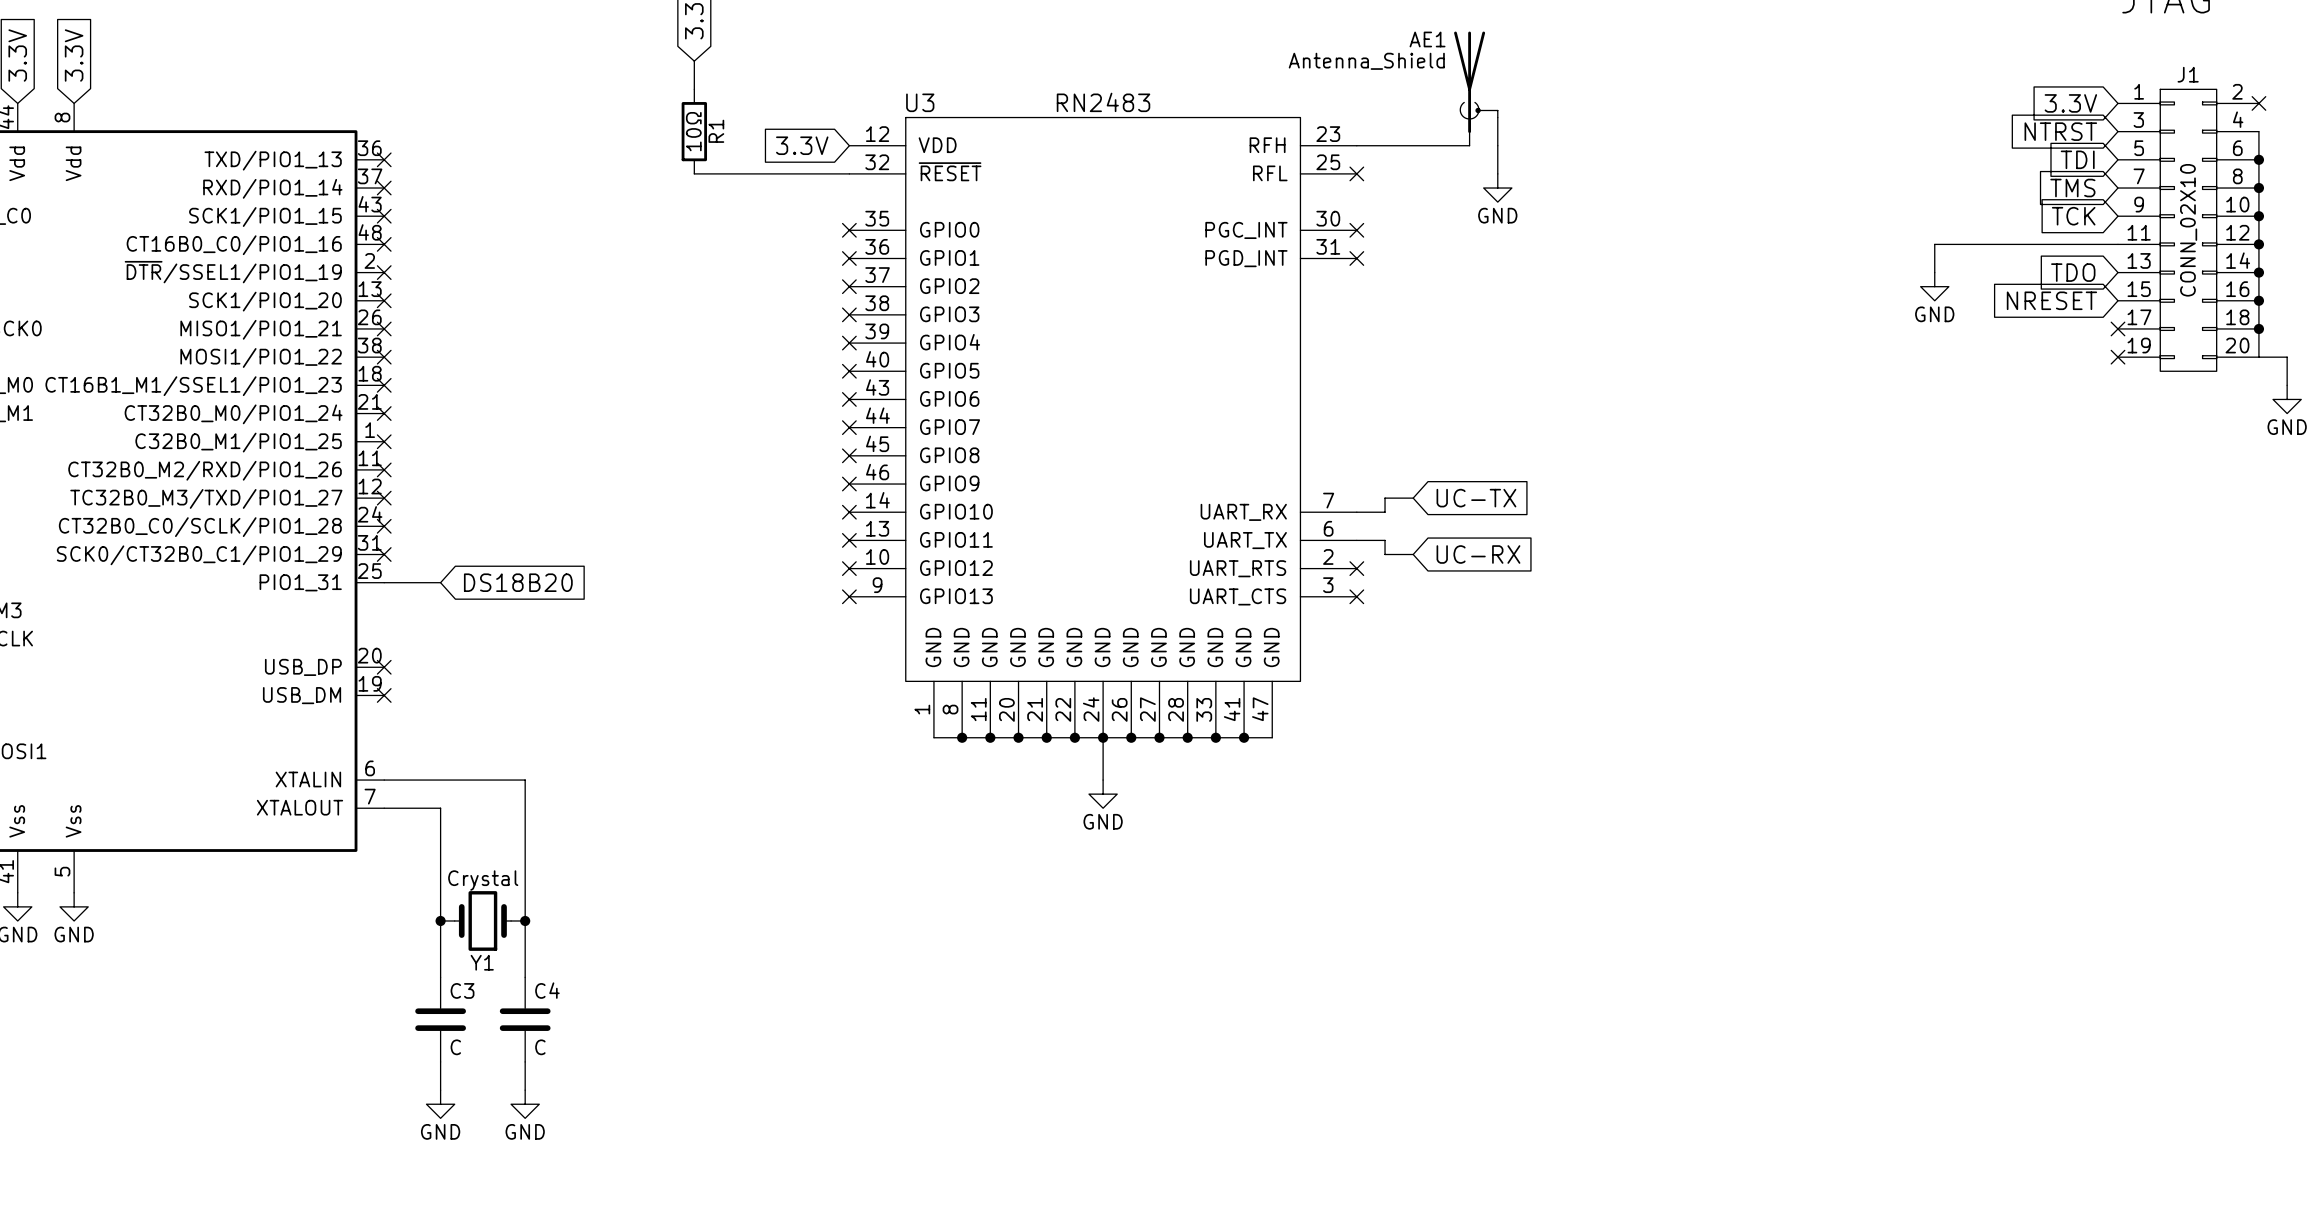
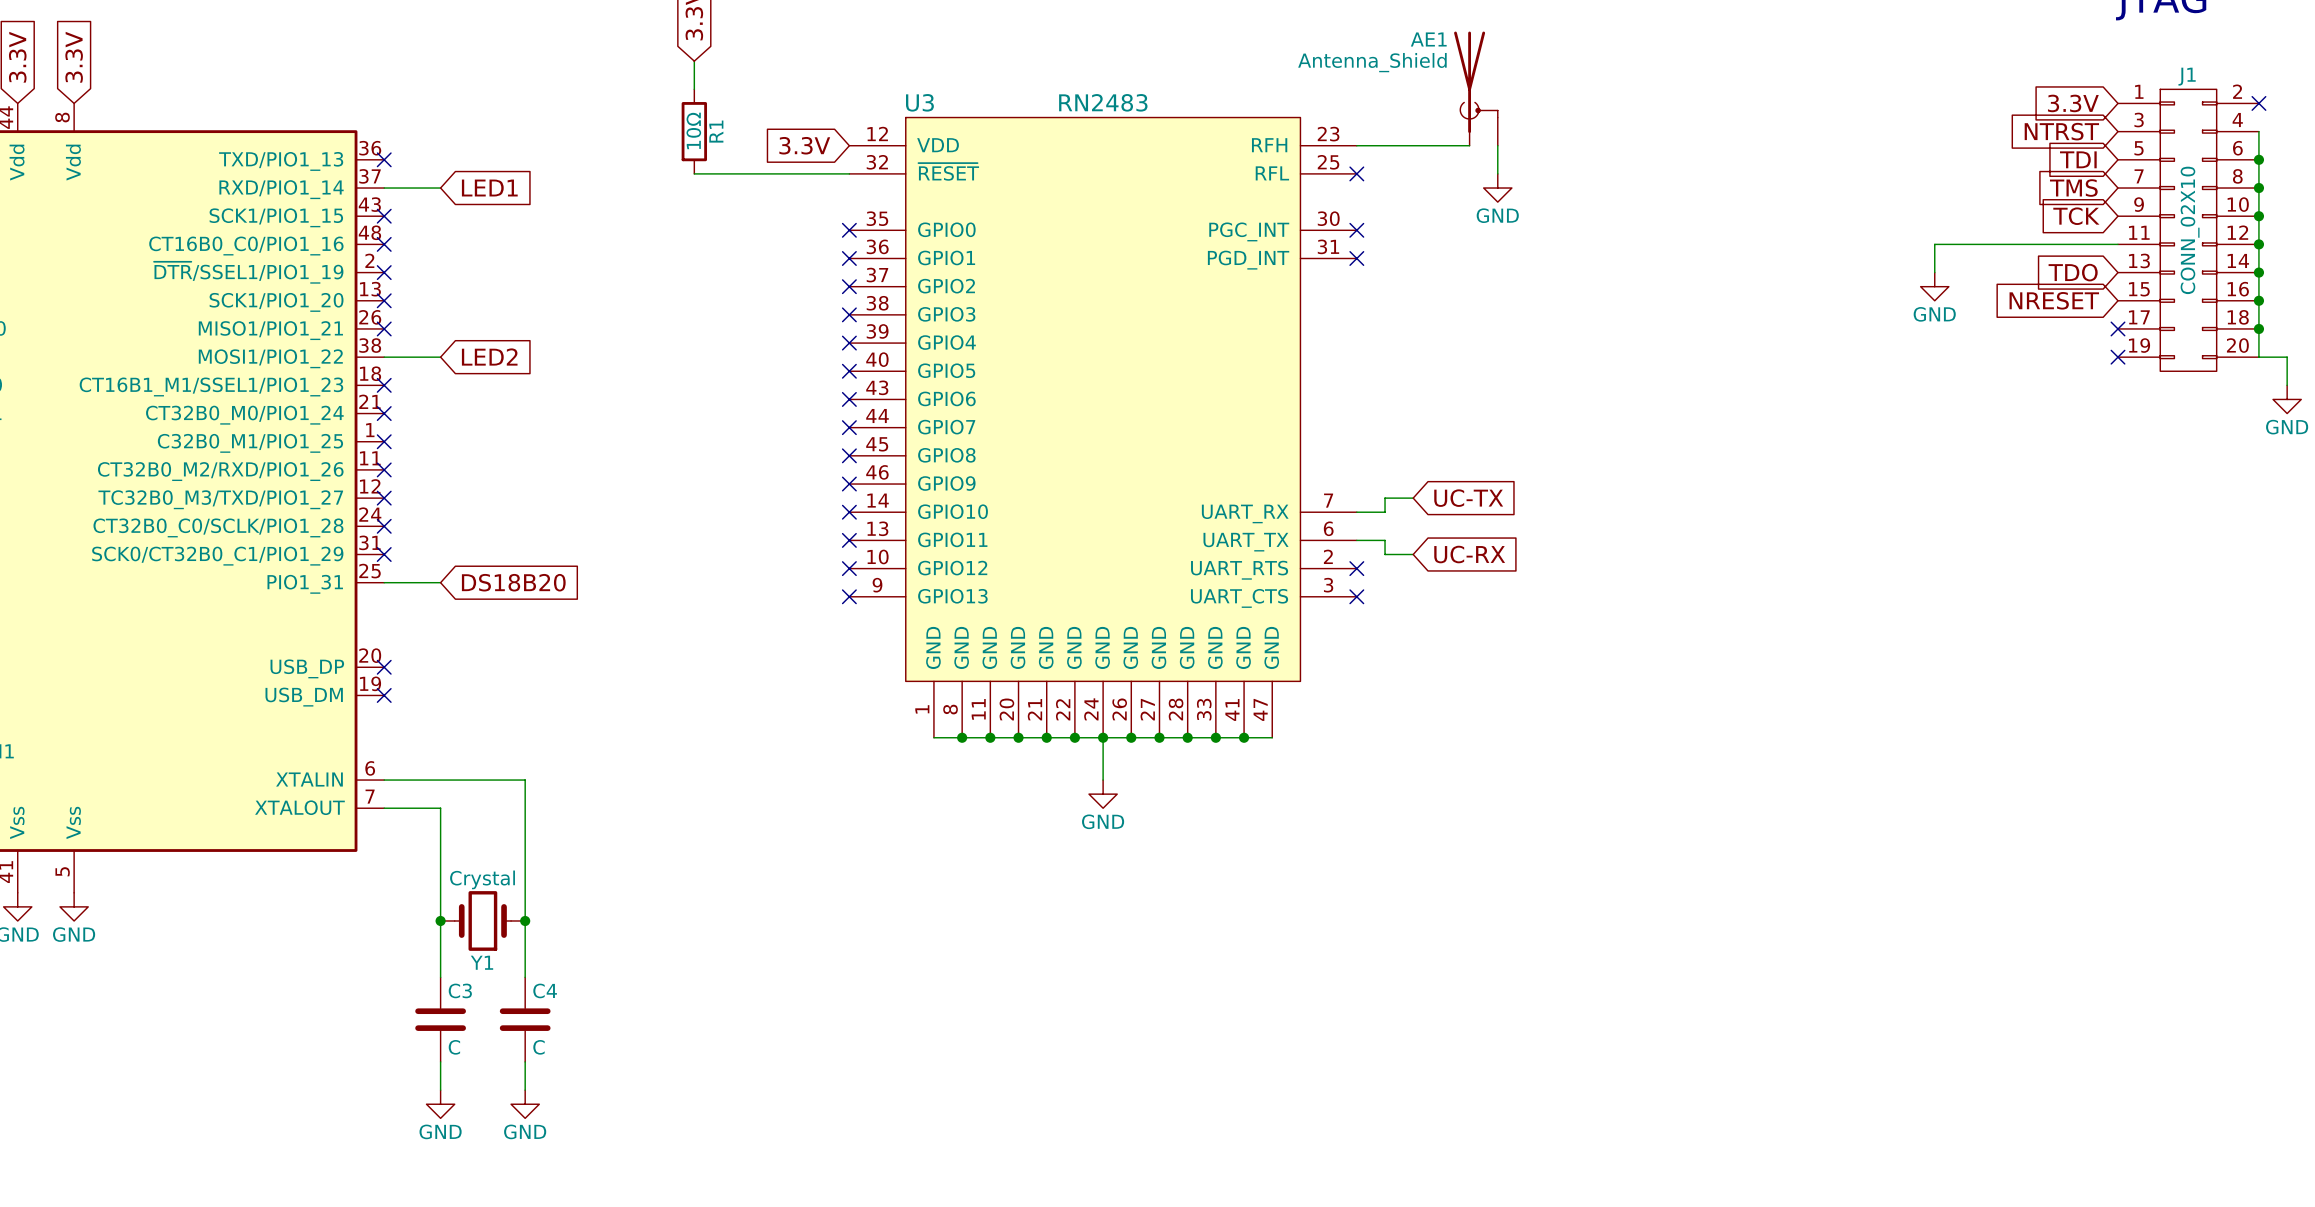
wire: none -> (384, 188) (440, 188)
no-connect mark: (384, 188) -> none
global label: none -> LED1 (489, 188)
wire: none -> (384, 357) (440, 357)
no-connect mark: (384, 357) -> none
global label: none -> LED2 (489, 357)

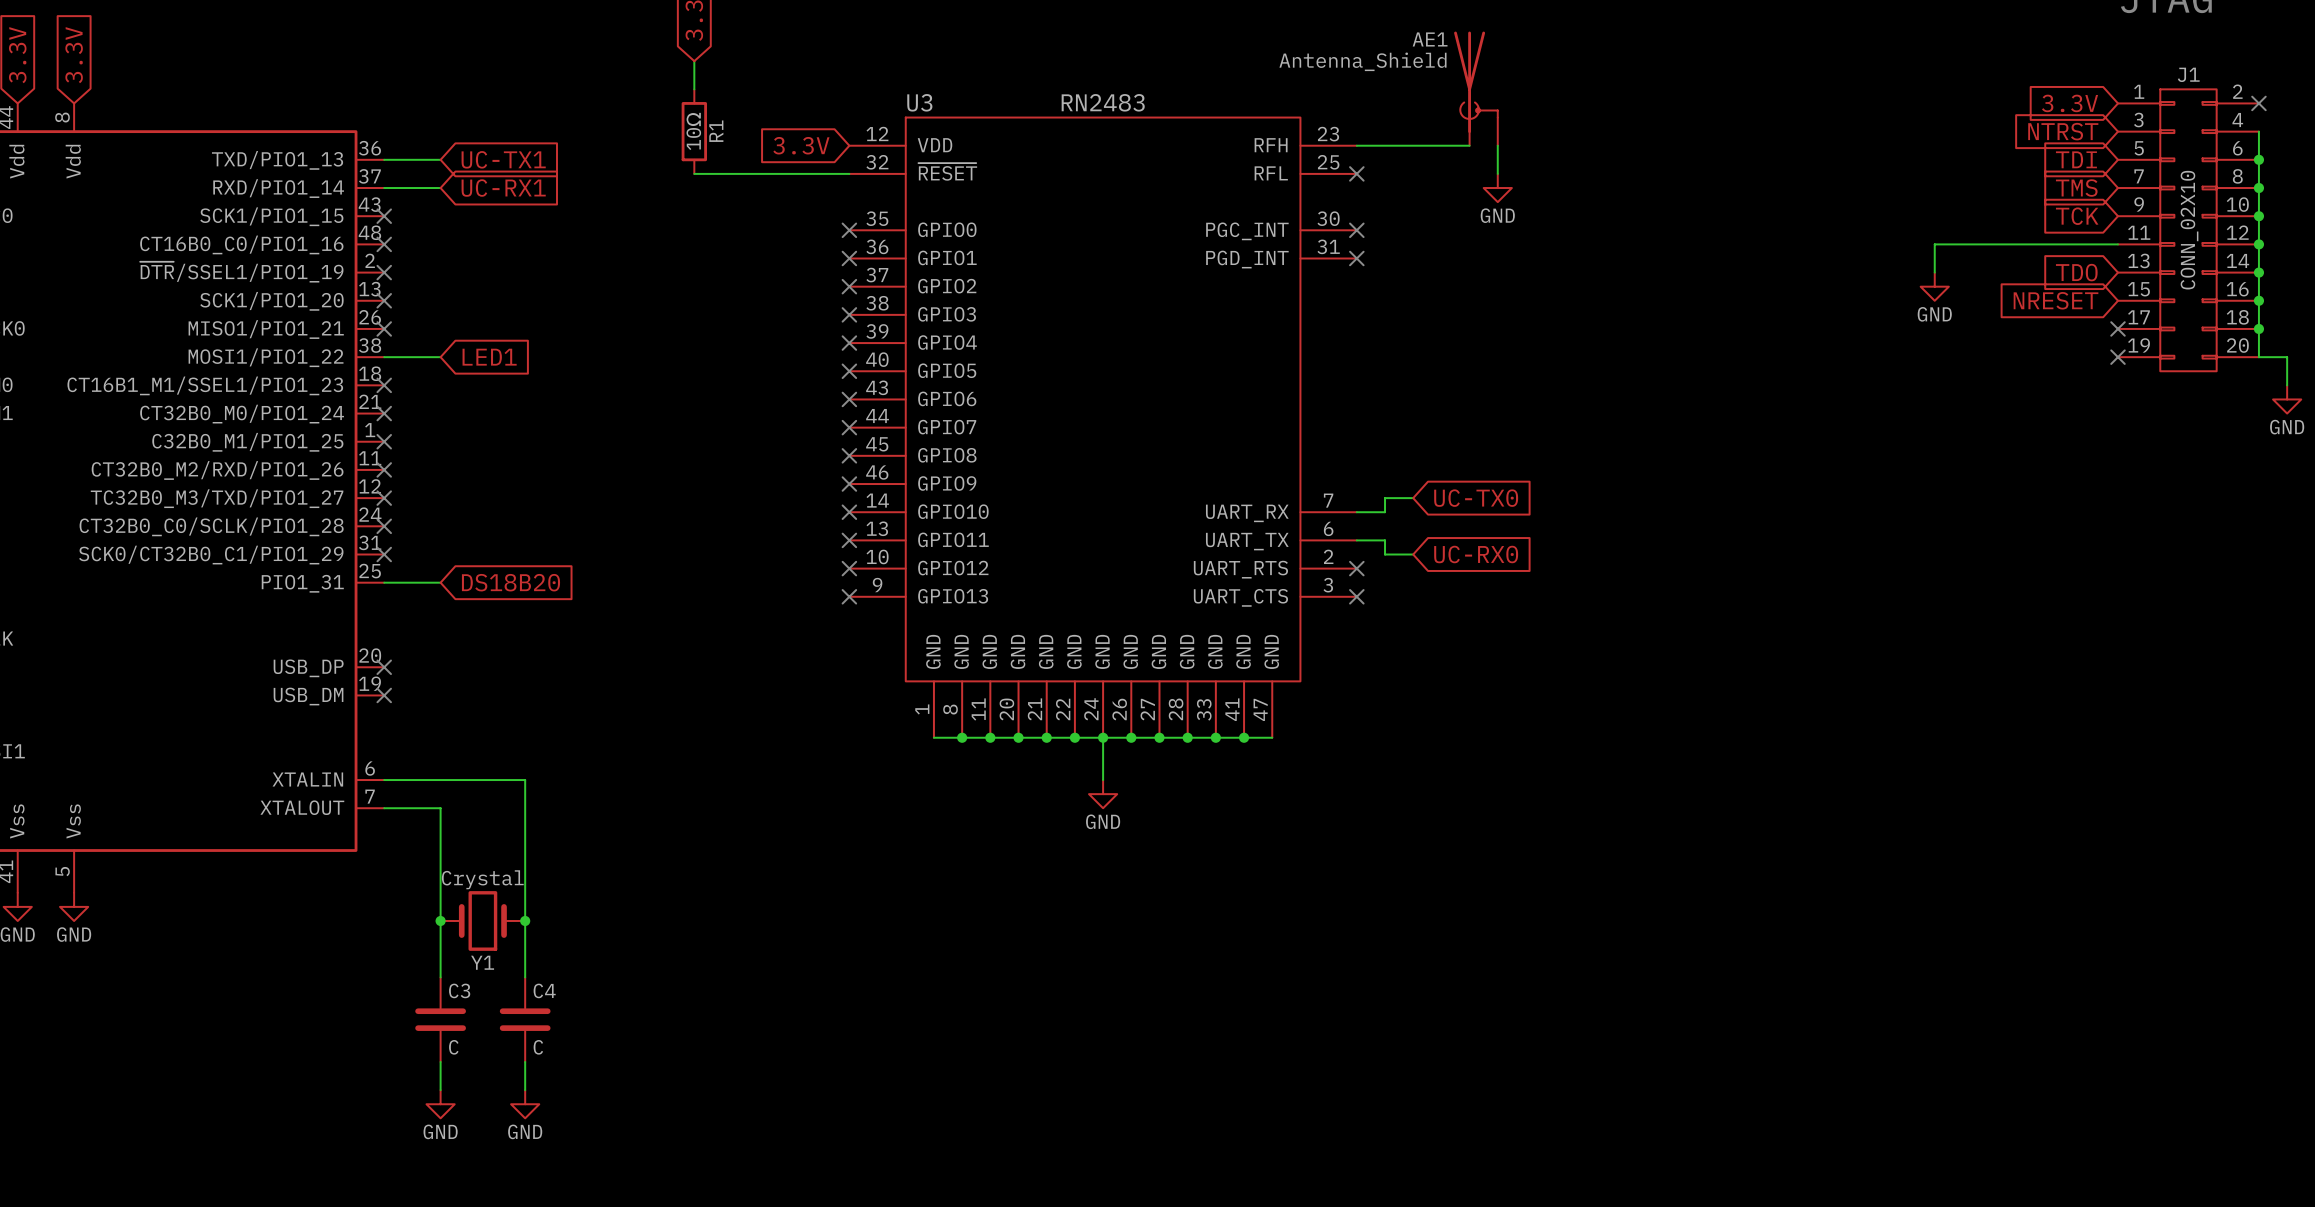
wire: none -> (384, 159) (440, 159)
no-connect mark: (384, 159) -> none
global label: none -> UC-TX1 (503, 159)
global label: LED1 (489, 188) -> UC-RX1 (503, 188)
global label: LED2 (489, 357) -> LED1 (489, 357)
global label: UC-TX (1468, 498) -> UC-TX0 (1476, 498)
global label: UC-RX (1469, 554) -> UC-RX0 (1476, 554)

